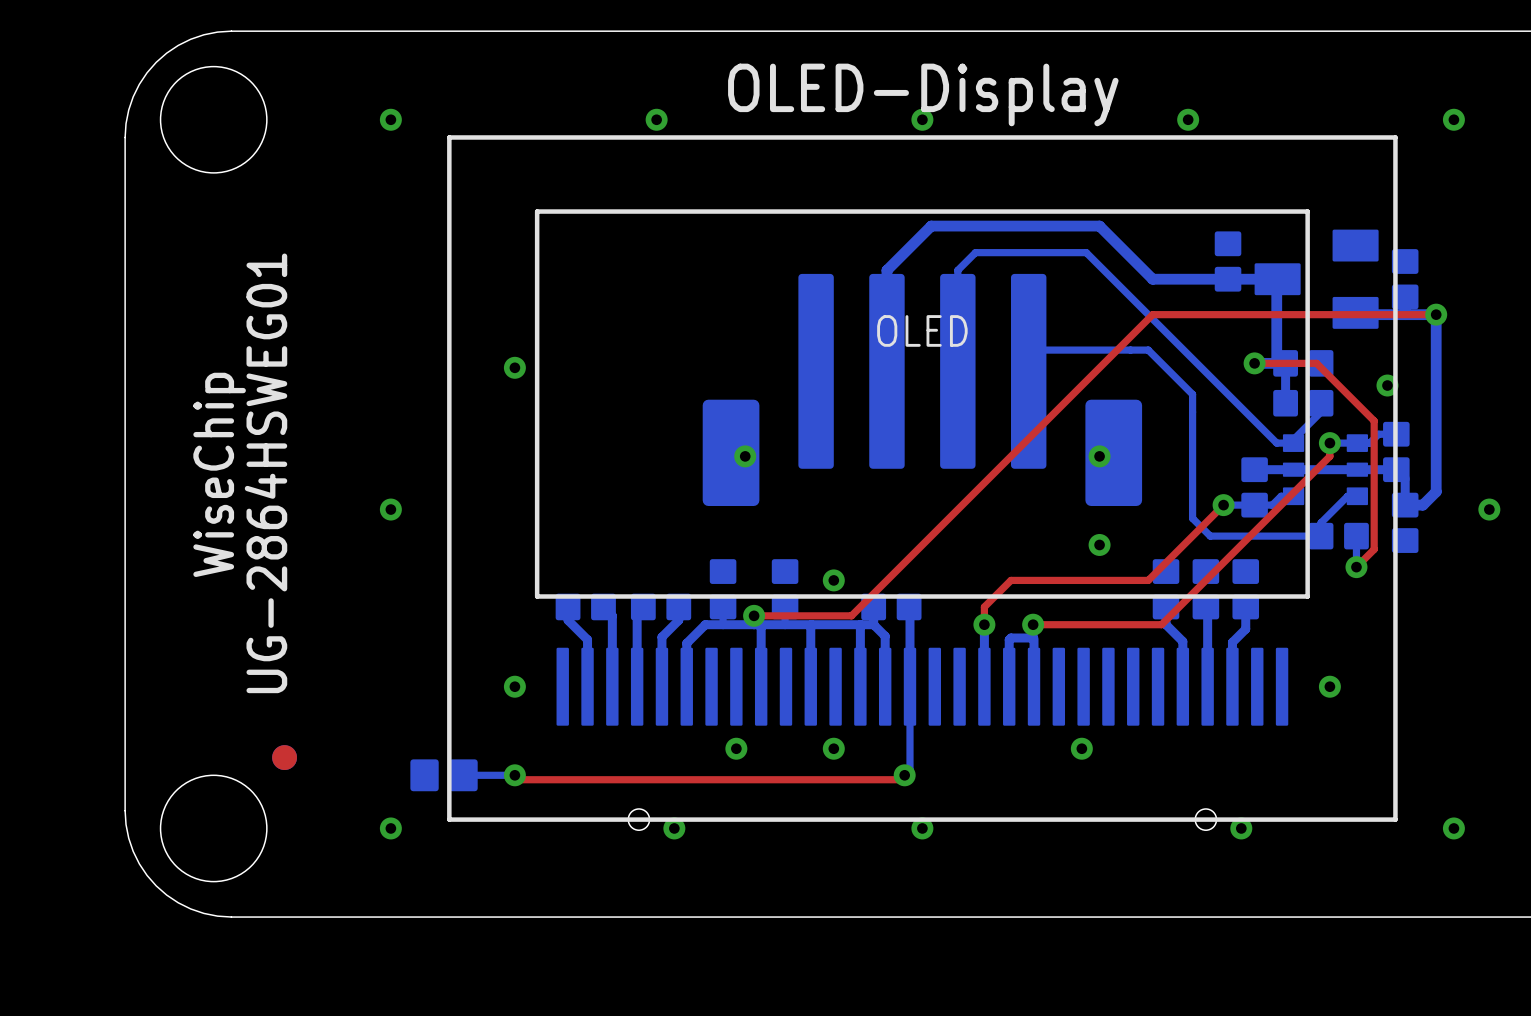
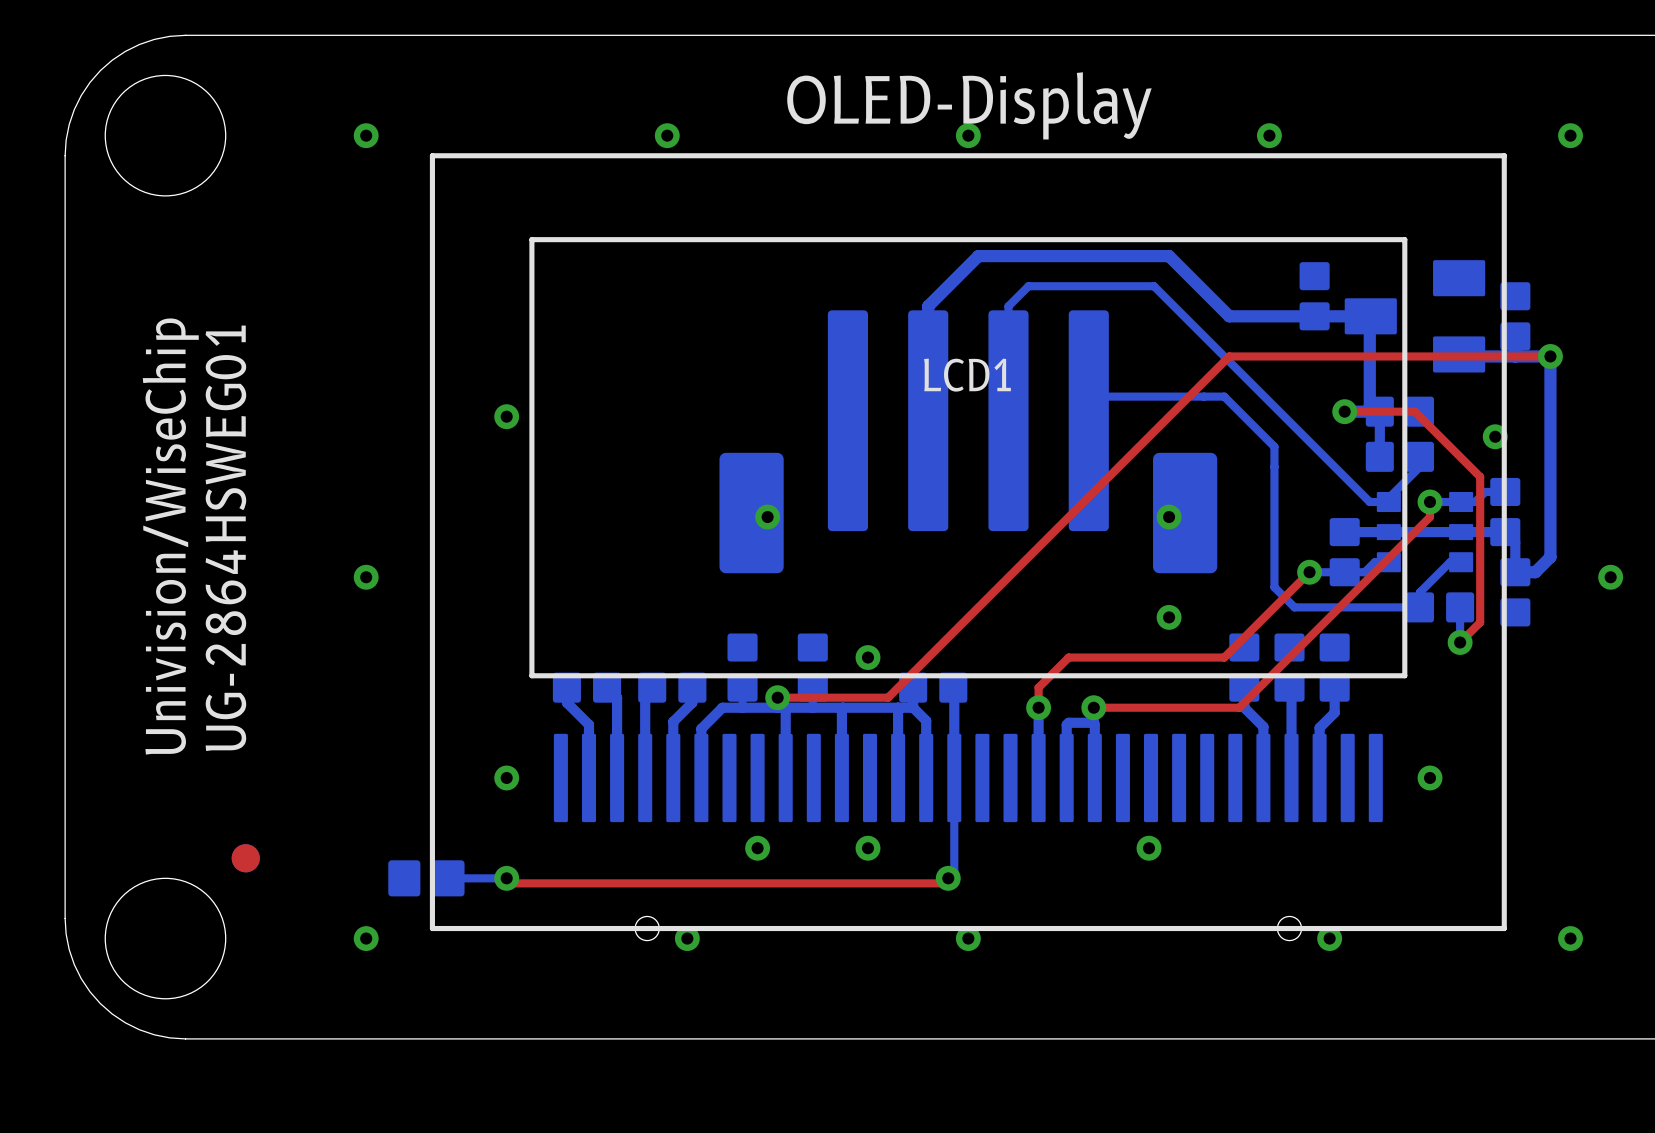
OLED name: OLED (922, 330) -> LCD1 (967, 375)
text: WiseChip (219, 474) -> Univision/WiseChip (170, 536)

